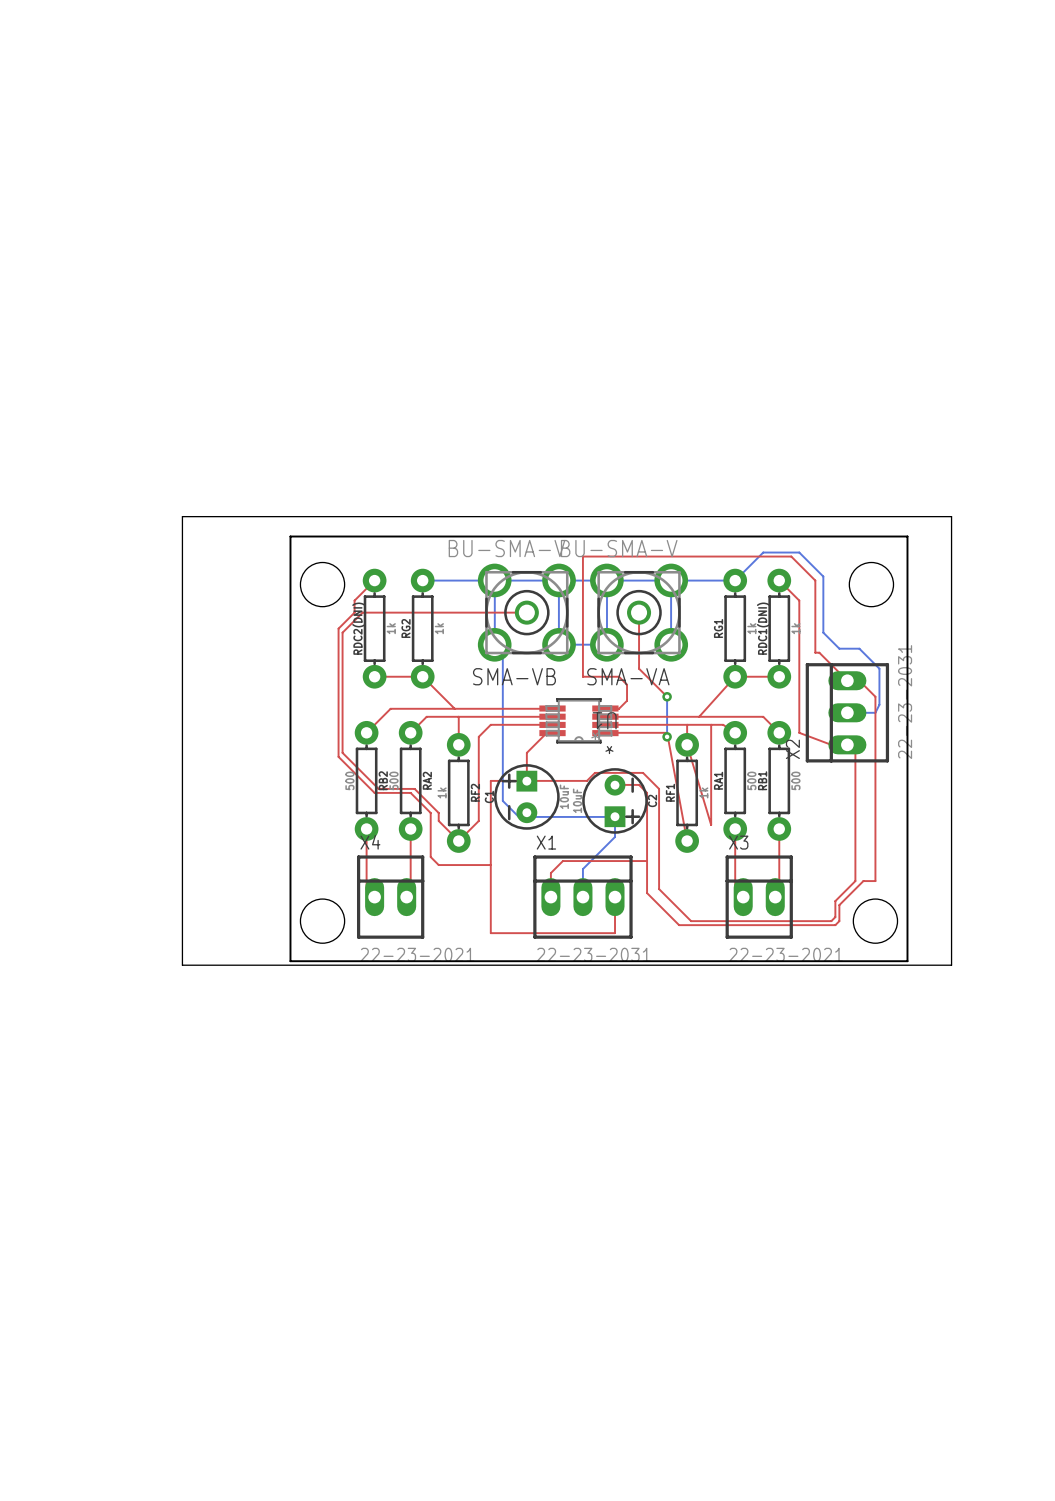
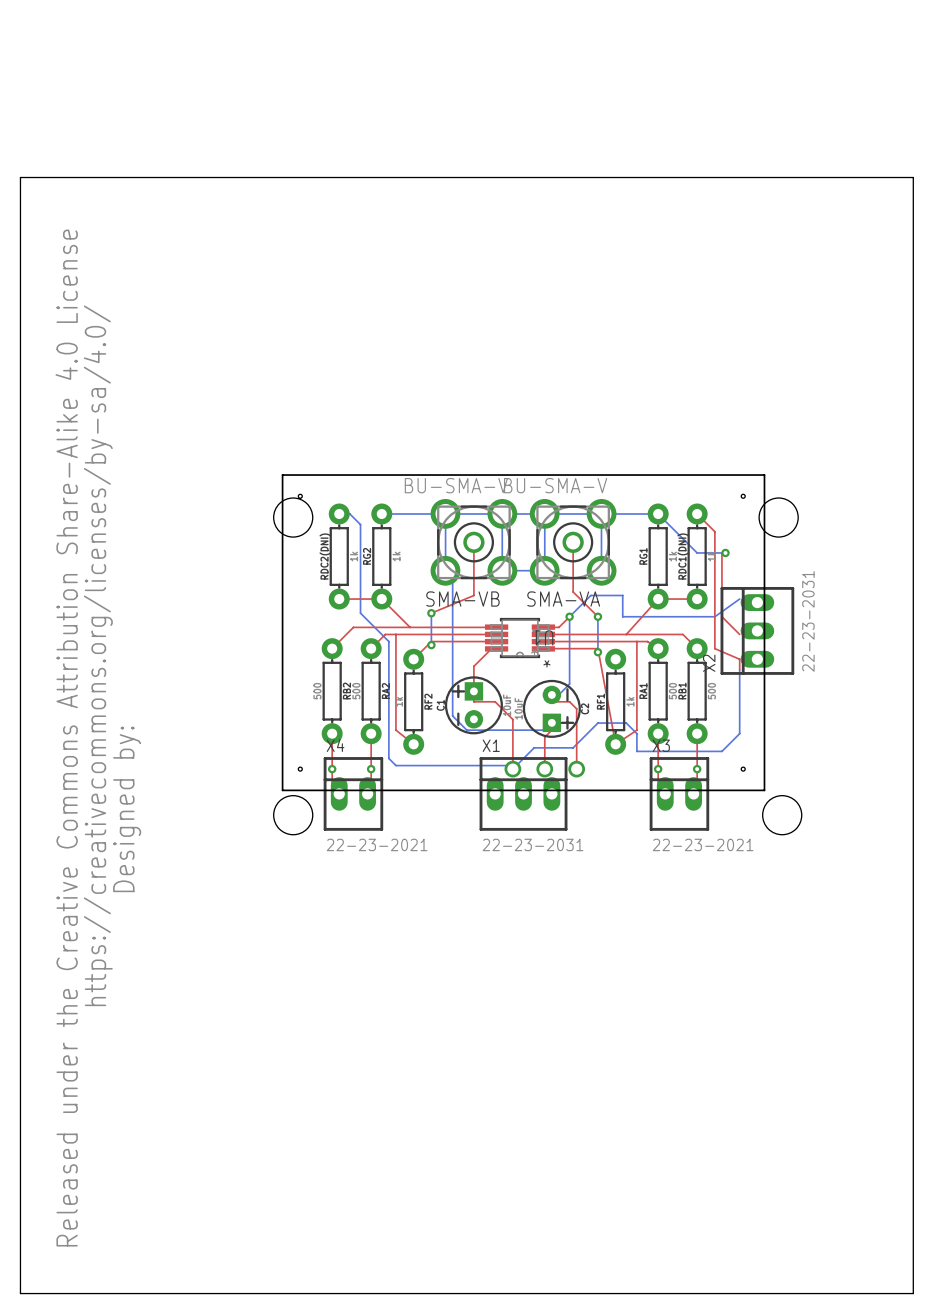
board edge: none -> (20, 177) (913, 177) (913, 1293) (20, 1293) (20, 177)
drawing: none -> [55, 229, 142, 1247]
board edge: (182, 516) (951, 516) (951, 965) (182, 965) (182, 516) -> none
board edge: (310, 536) (290, 536) (290, 961) (907, 961) (907, 536) (855, 536) -> (282, 475) (282, 790) (764, 790) (764, 475)
hole: none -> (300, 496)
hole: none -> (743, 496)
top track: (374, 580) (354, 600) (354, 612) (338, 628) (338, 756) (374, 792) (410, 792) (430, 812) (430, 857) (438, 865) (490, 865) -> none
bottom track: none -> (339, 513) (349, 513) (360, 524) (360, 613) (388, 641) (388, 758) (395, 765) (516, 765) (534, 747) (573, 747) (597, 723) (626, 723) (636, 733) (636, 751) (721, 751) (739, 733) (739, 669)
bottom track: (735, 580) (763, 552) (799, 552) (823, 576) (823, 632) (839, 648) (859, 648) (879, 668) (879, 704) (875, 712) (847, 712) -> (658, 513) (697, 552) (725, 552)
top track: (526, 612) (362, 612) (342, 632) (342, 752) (378, 788) (414, 788) (438, 812) -> (473, 542) (473, 595) (431, 613)
top track: none -> (725, 552) (721, 552) (721, 616) (739, 634)
via: none -> (725, 552)
bottom track: none -> (739, 599) (714, 616) (622, 616) (622, 595) (590, 595) (569, 616) (569, 684) (551, 701)
bottom track: none -> (431, 613) (431, 645)
via: none -> (431, 613)
via: none -> (569, 616)
top track: (619, 708) (627, 700) (627, 684) (619, 676) (582, 676) (582, 556) (791, 556) (815, 580) (815, 652) (819, 652) (847, 680) (859, 680) (875, 696) (875, 881) (863, 881) (839, 905) (839, 921) (835, 925) (679, 925) (647, 893) (647, 792) (639, 784) (615, 784) -> (555, 627) (558, 627) (569, 616)
top track: none -> (395, 634) (395, 719)
top track: (458, 716) (458, 744) -> (442, 641) (431, 641) (413, 659)
top track: (490, 724) (478, 736) (478, 820) (458, 841) (438, 820) -> (413, 744) (395, 730) (395, 726)
top track: (687, 724) (687, 744) (711, 824) -> (615, 744) (636, 730)
via: none -> (431, 645)
top track: (799, 732) (831, 744) (847, 744) (855, 752) (855, 881) (835, 901) (835, 917) (831, 921) (691, 921) (659, 889) (659, 788) (643, 772) (594, 772) (586, 780) (490, 780) (490, 933) (615, 933) (615, 897) -> (714, 648) (739, 659) (739, 669)
top track: none -> (473, 691) (473, 701) (495, 701) (512, 719) (512, 769)
top track: none -> (551, 701) (569, 701) (576, 708) (576, 769)
bottom track: (502, 800) (518, 816) (615, 816) (615, 837) (582, 869) (582, 897) -> (452, 708) (452, 715) (466, 730) (551, 730)
top track: none -> (551, 730) (544, 737) (544, 769)
top track: (647, 861) (562, 861) (550, 873) (550, 901) -> none
hole: none -> (300, 769)
via: none -> (332, 769)
via: none -> (371, 769)
via: none -> (512, 769)
via: none -> (544, 769)
via: none -> (576, 769)
via: none -> (658, 769)
via: none -> (697, 769)
hole: none -> (743, 769)

